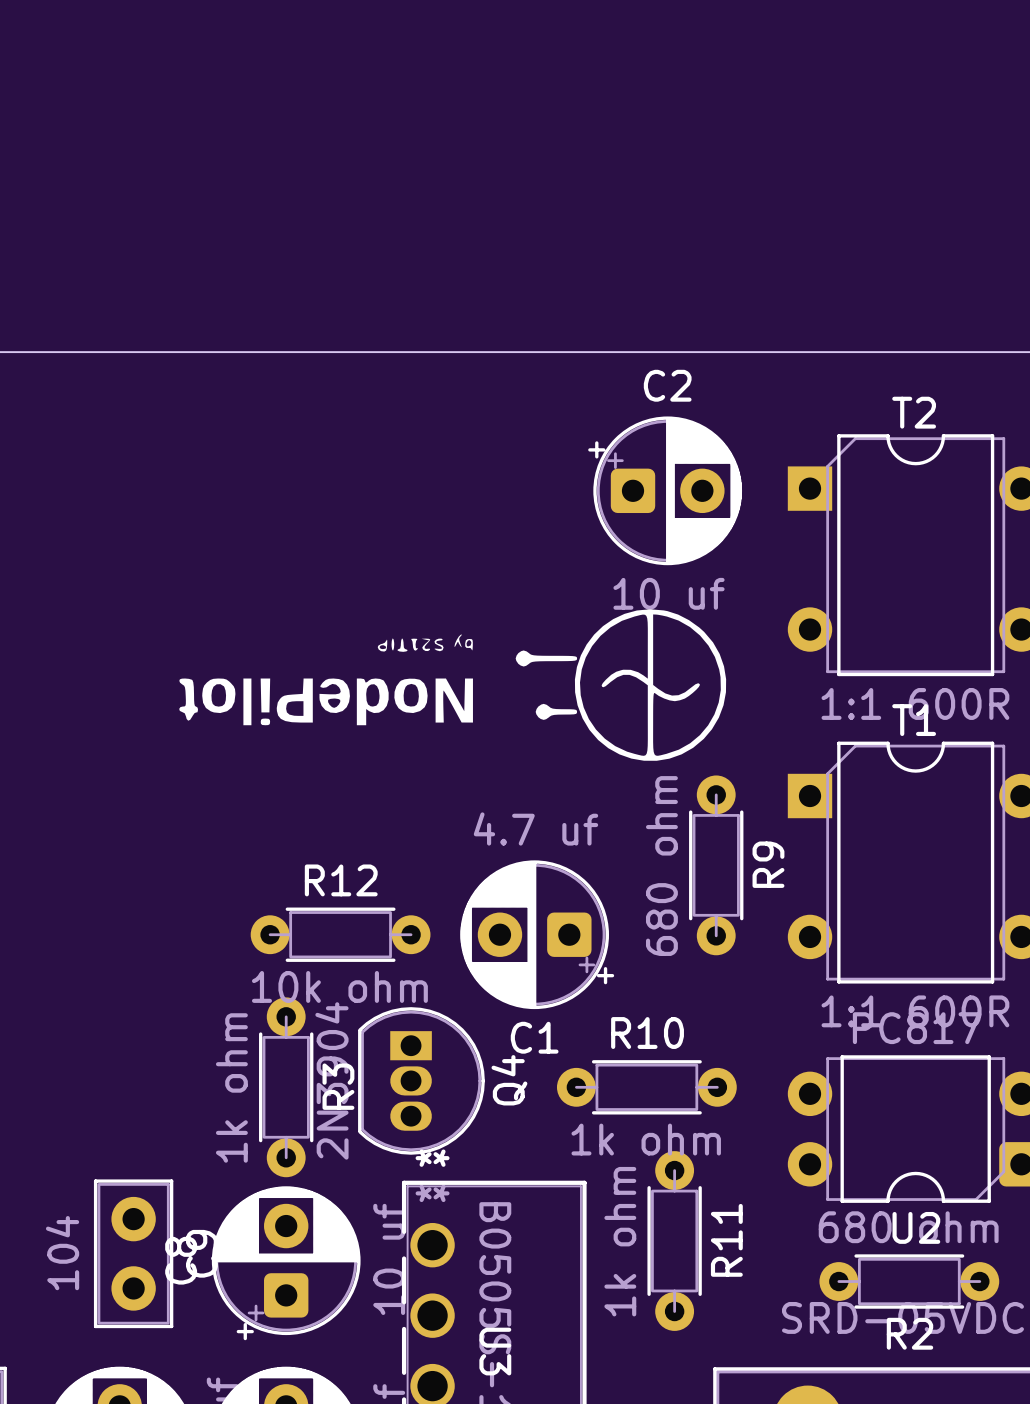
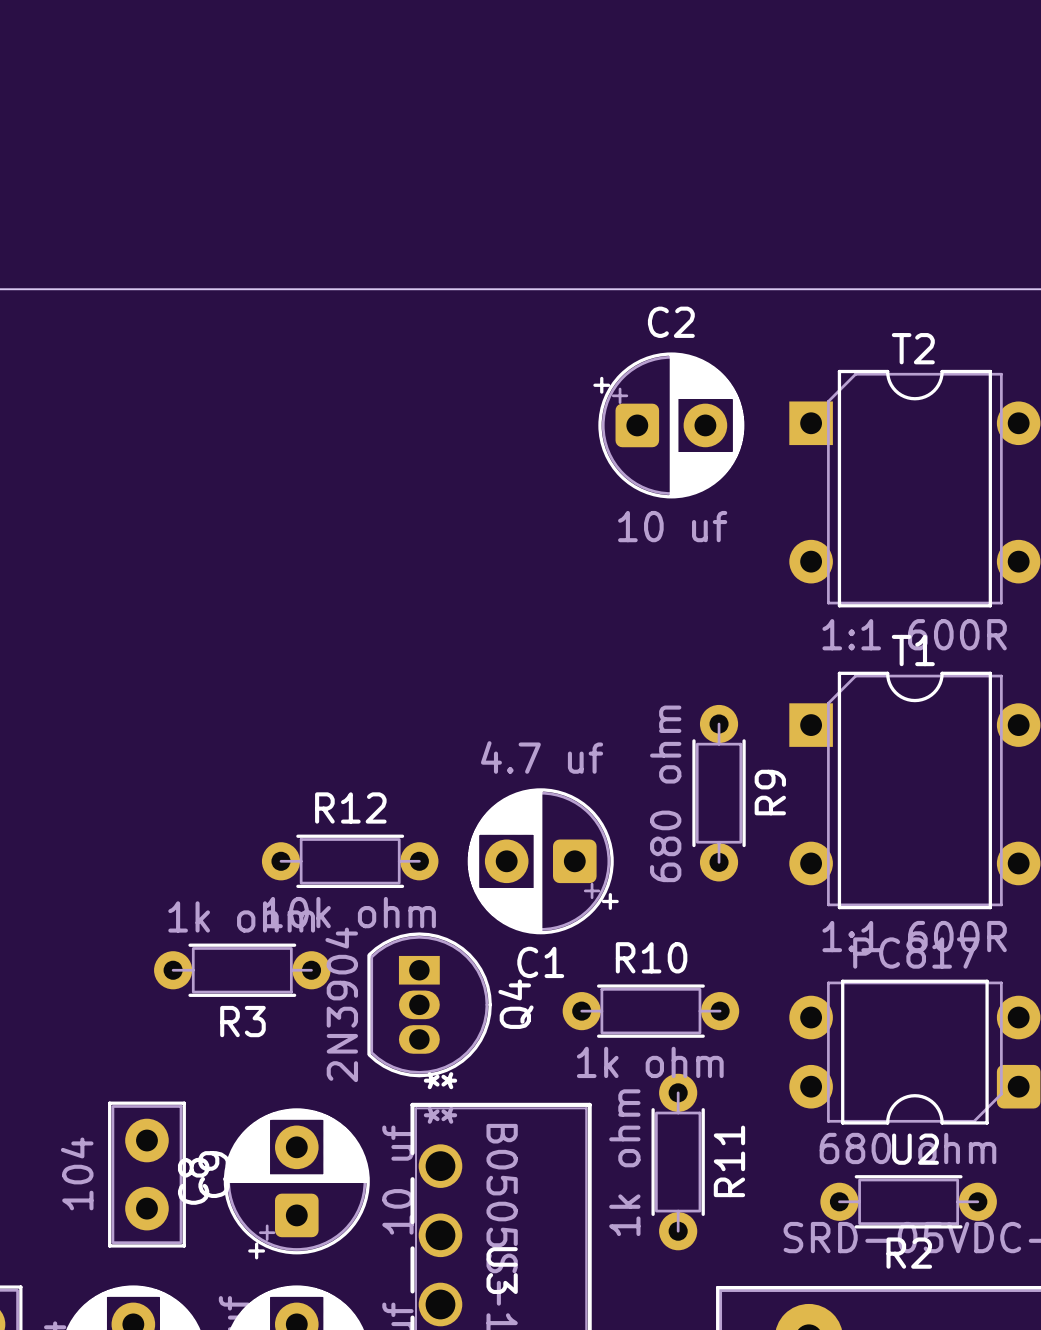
drawing: [179, 609, 727, 761] -> none
R3 rotation: 0° (286, 1087) -> 90° clockwise (242, 970)

